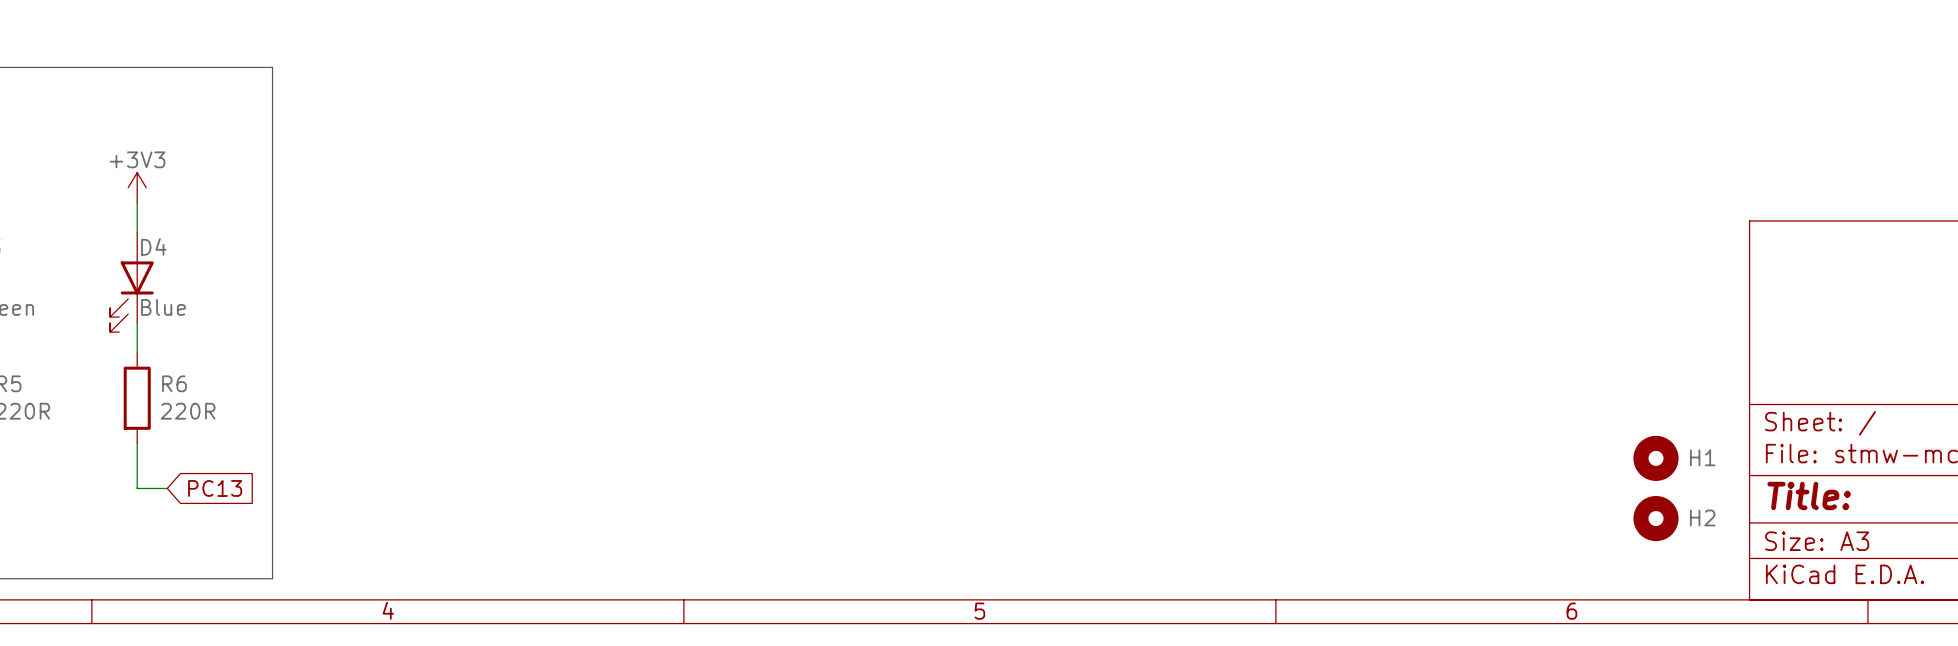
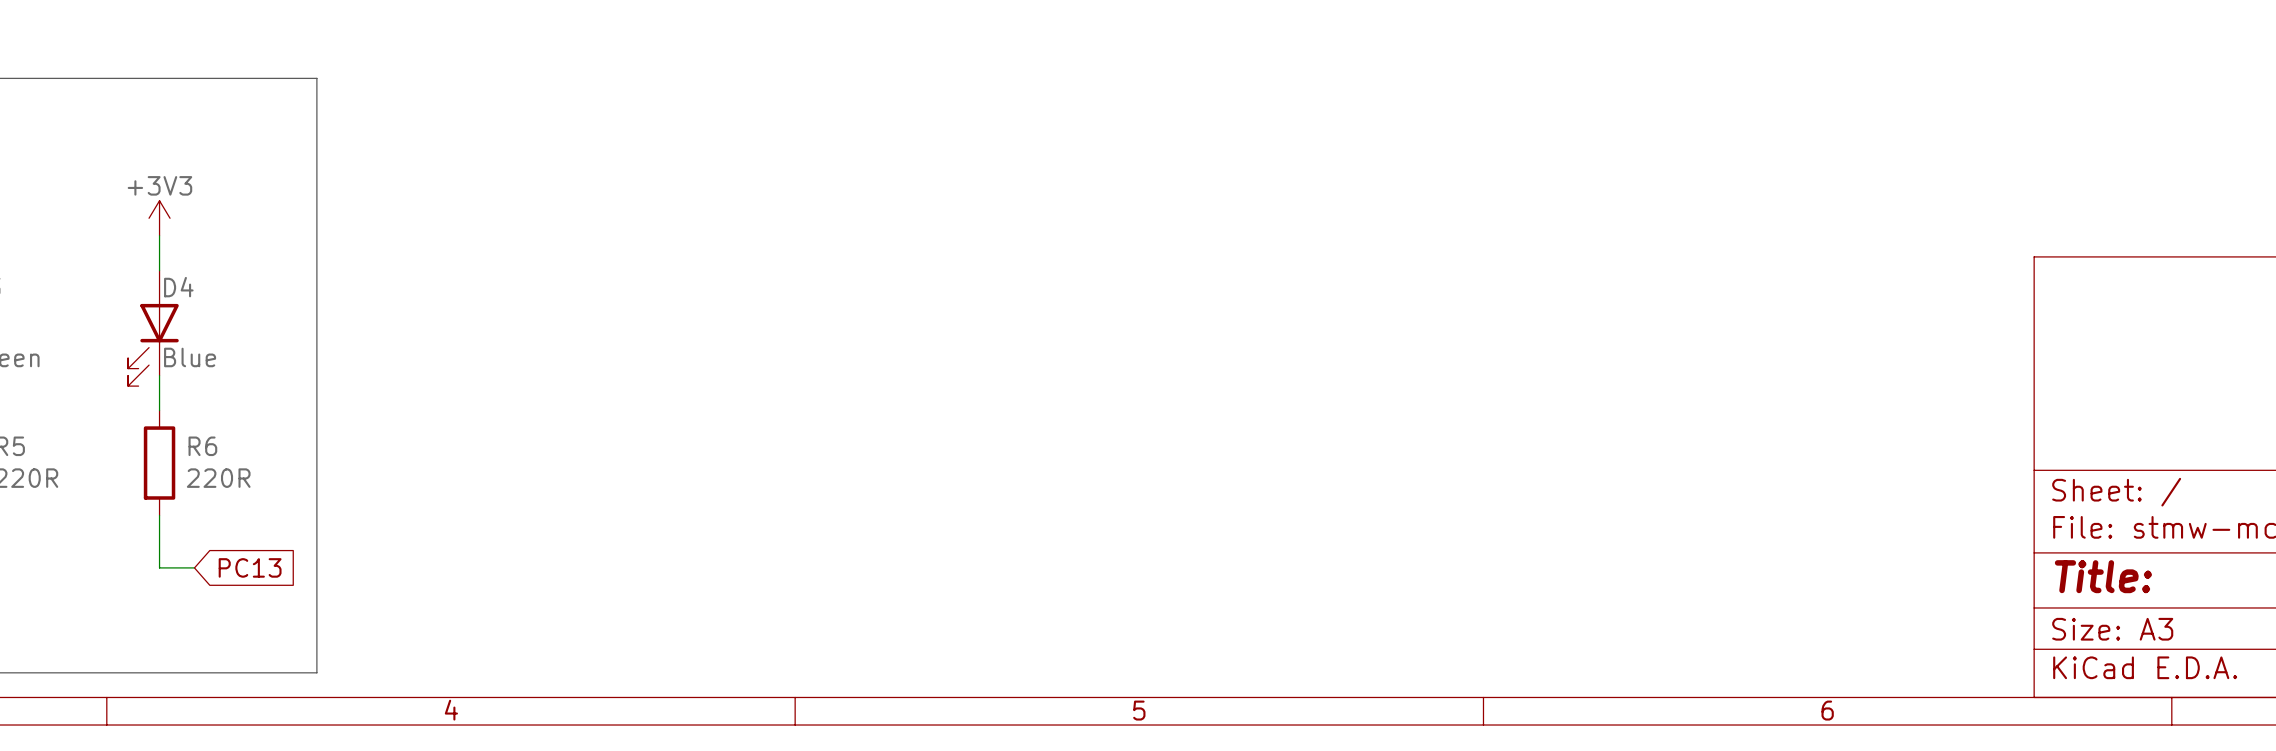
H1: (1656, 458) -> none
H2: (1656, 518) -> none

